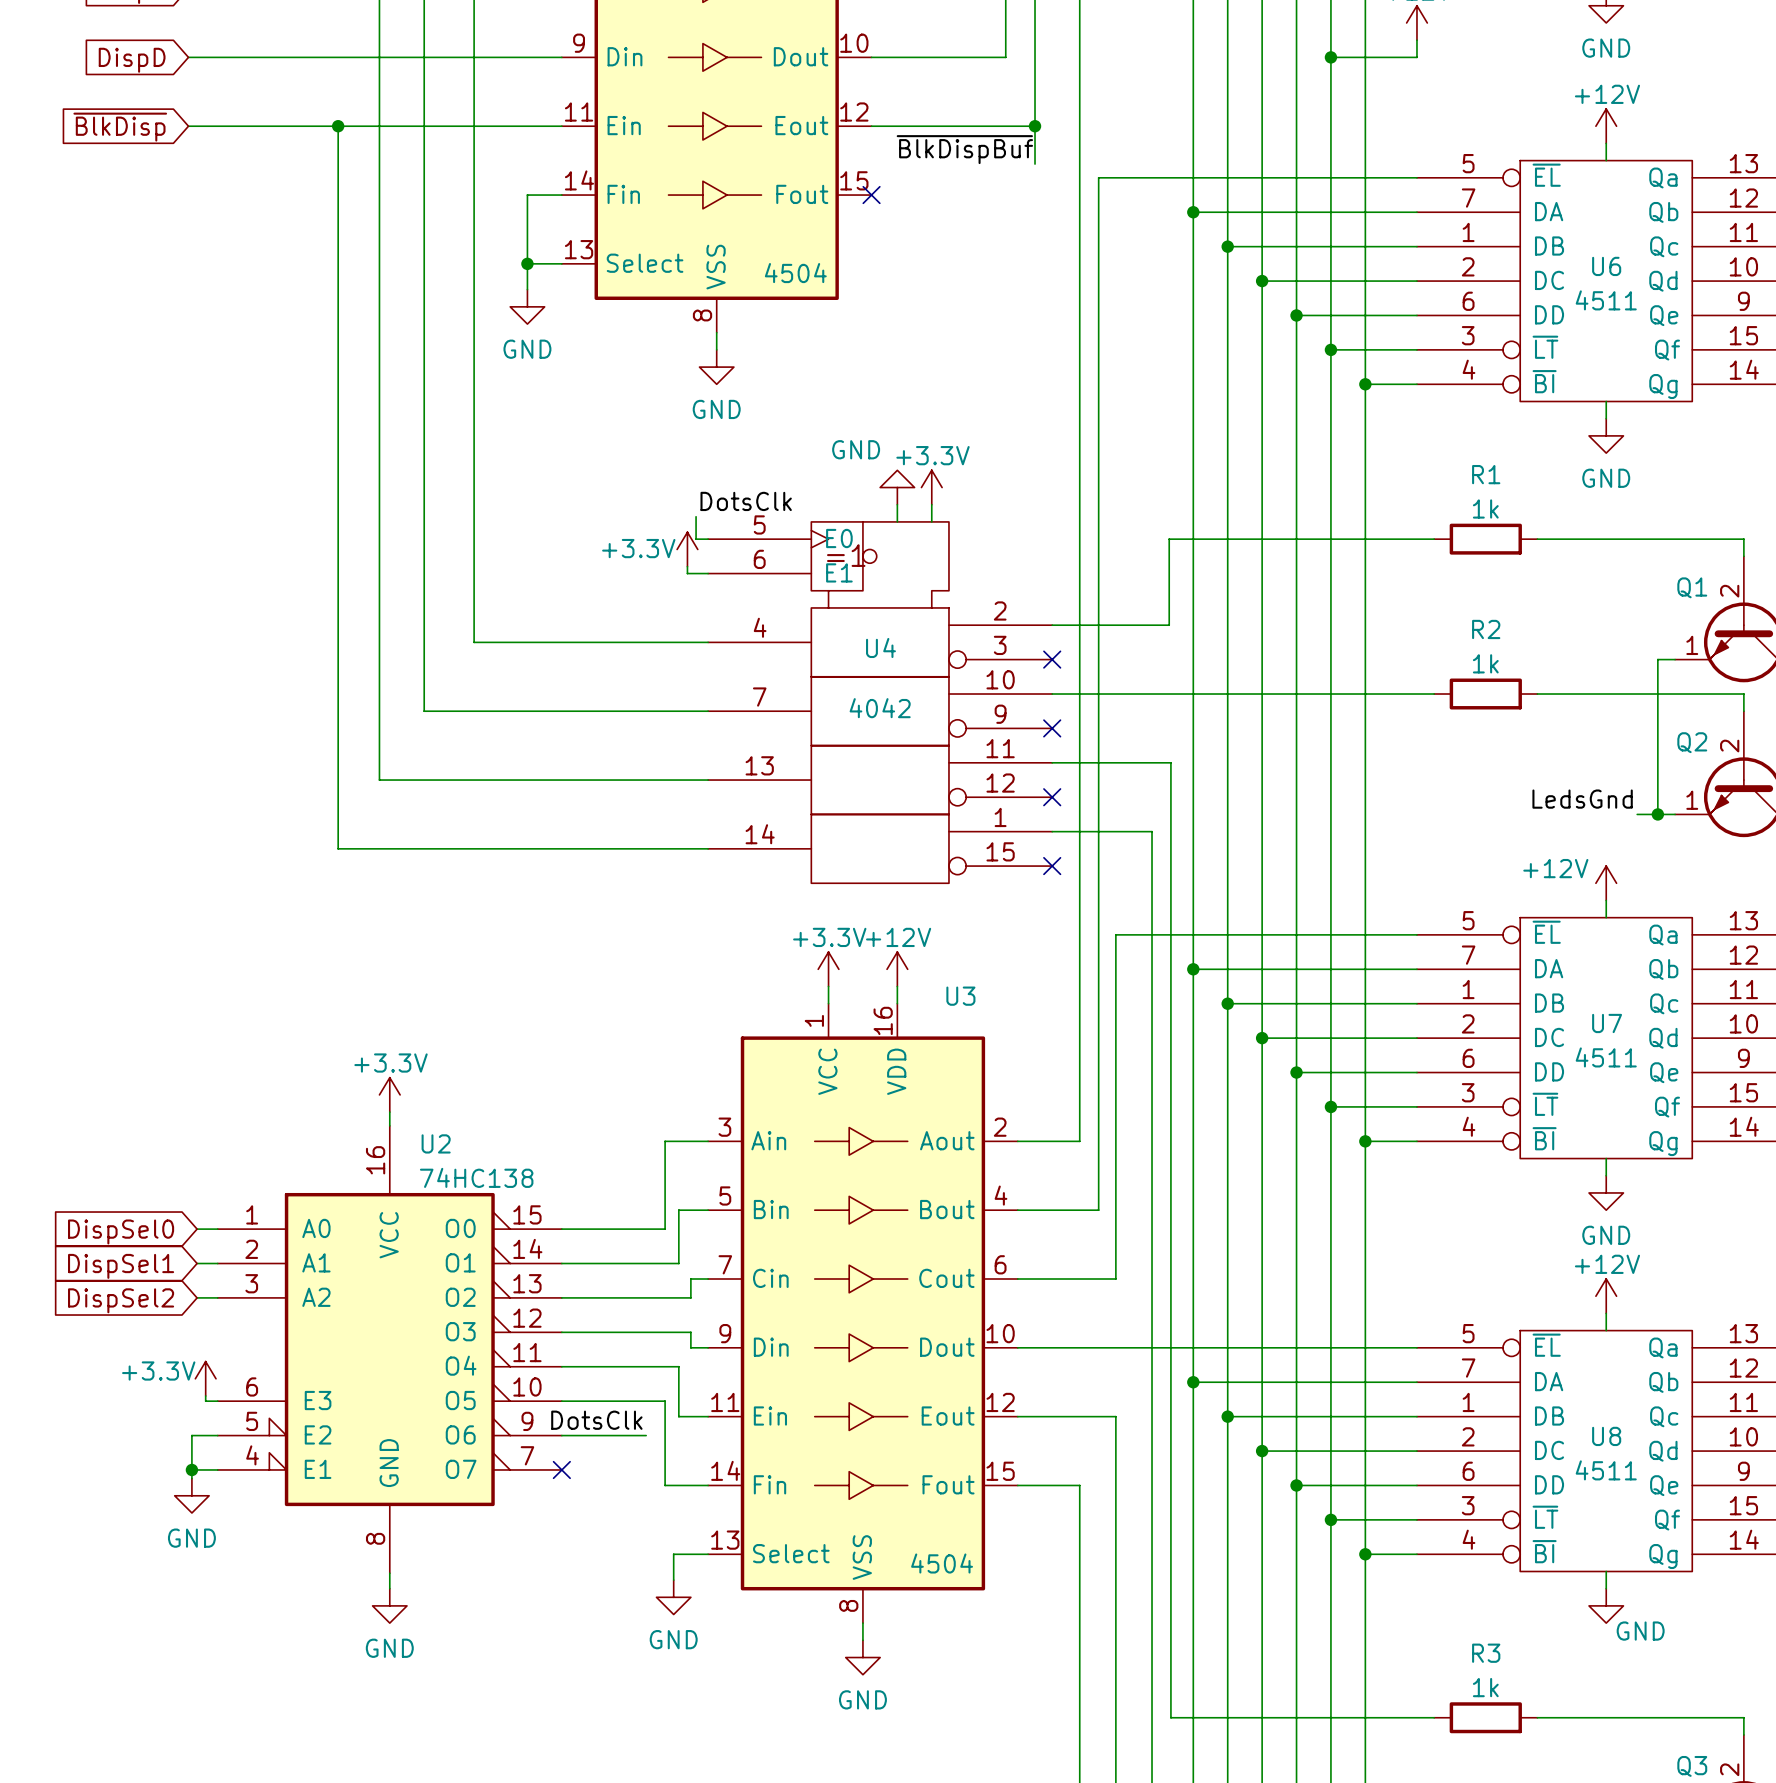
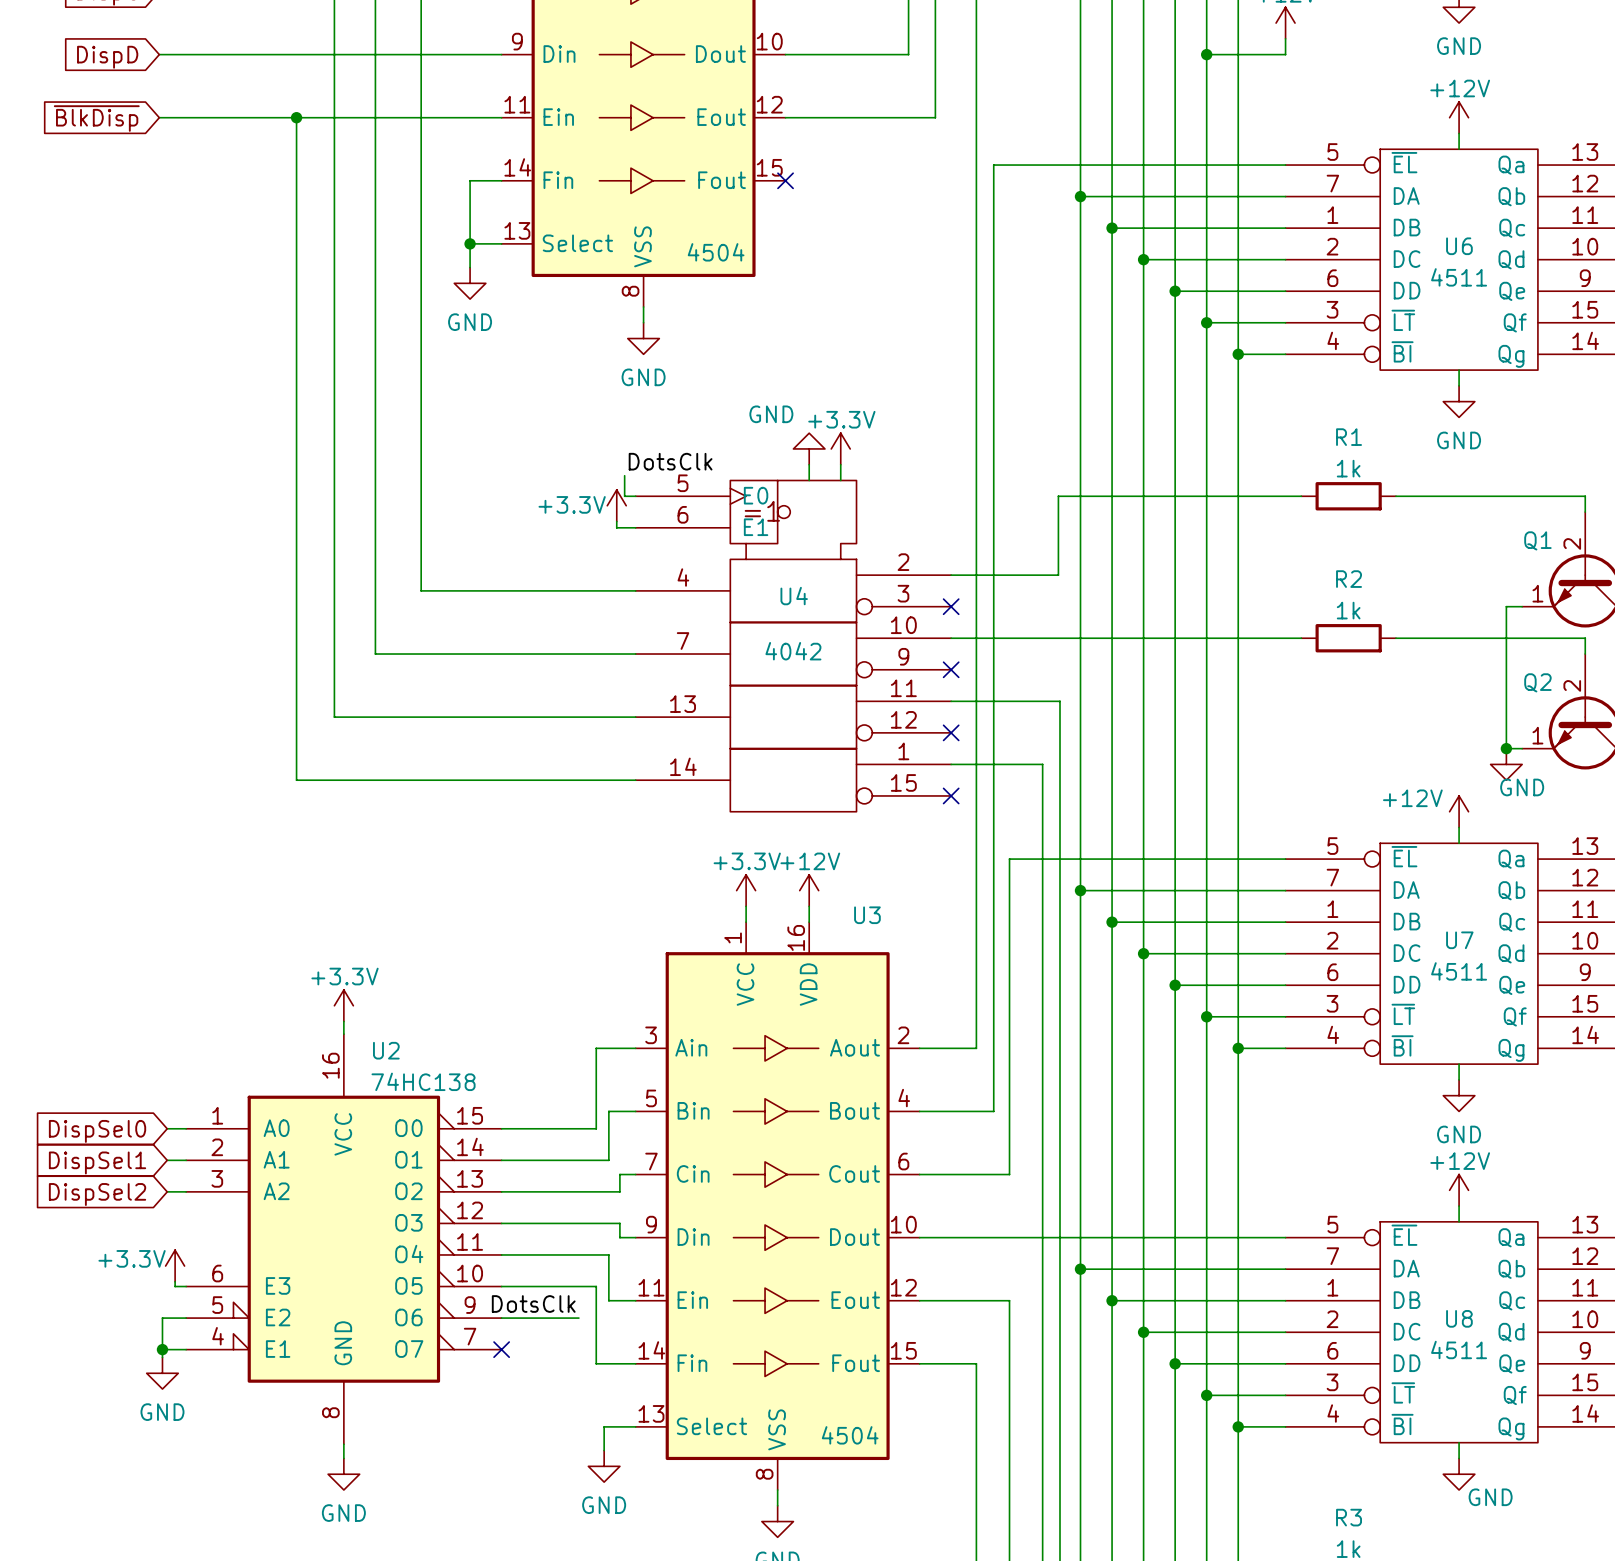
wire: (1035, 126) (1035, 164) -> none
junction: (1035, 126) -> none
label: ~{BlkDispBuf} (964, 149) -> none
label: LedsGnd (1582, 799) -> none
wire: (1637, 814) (1657, 814) -> none
power symbol: none -> GND (1506, 764)

